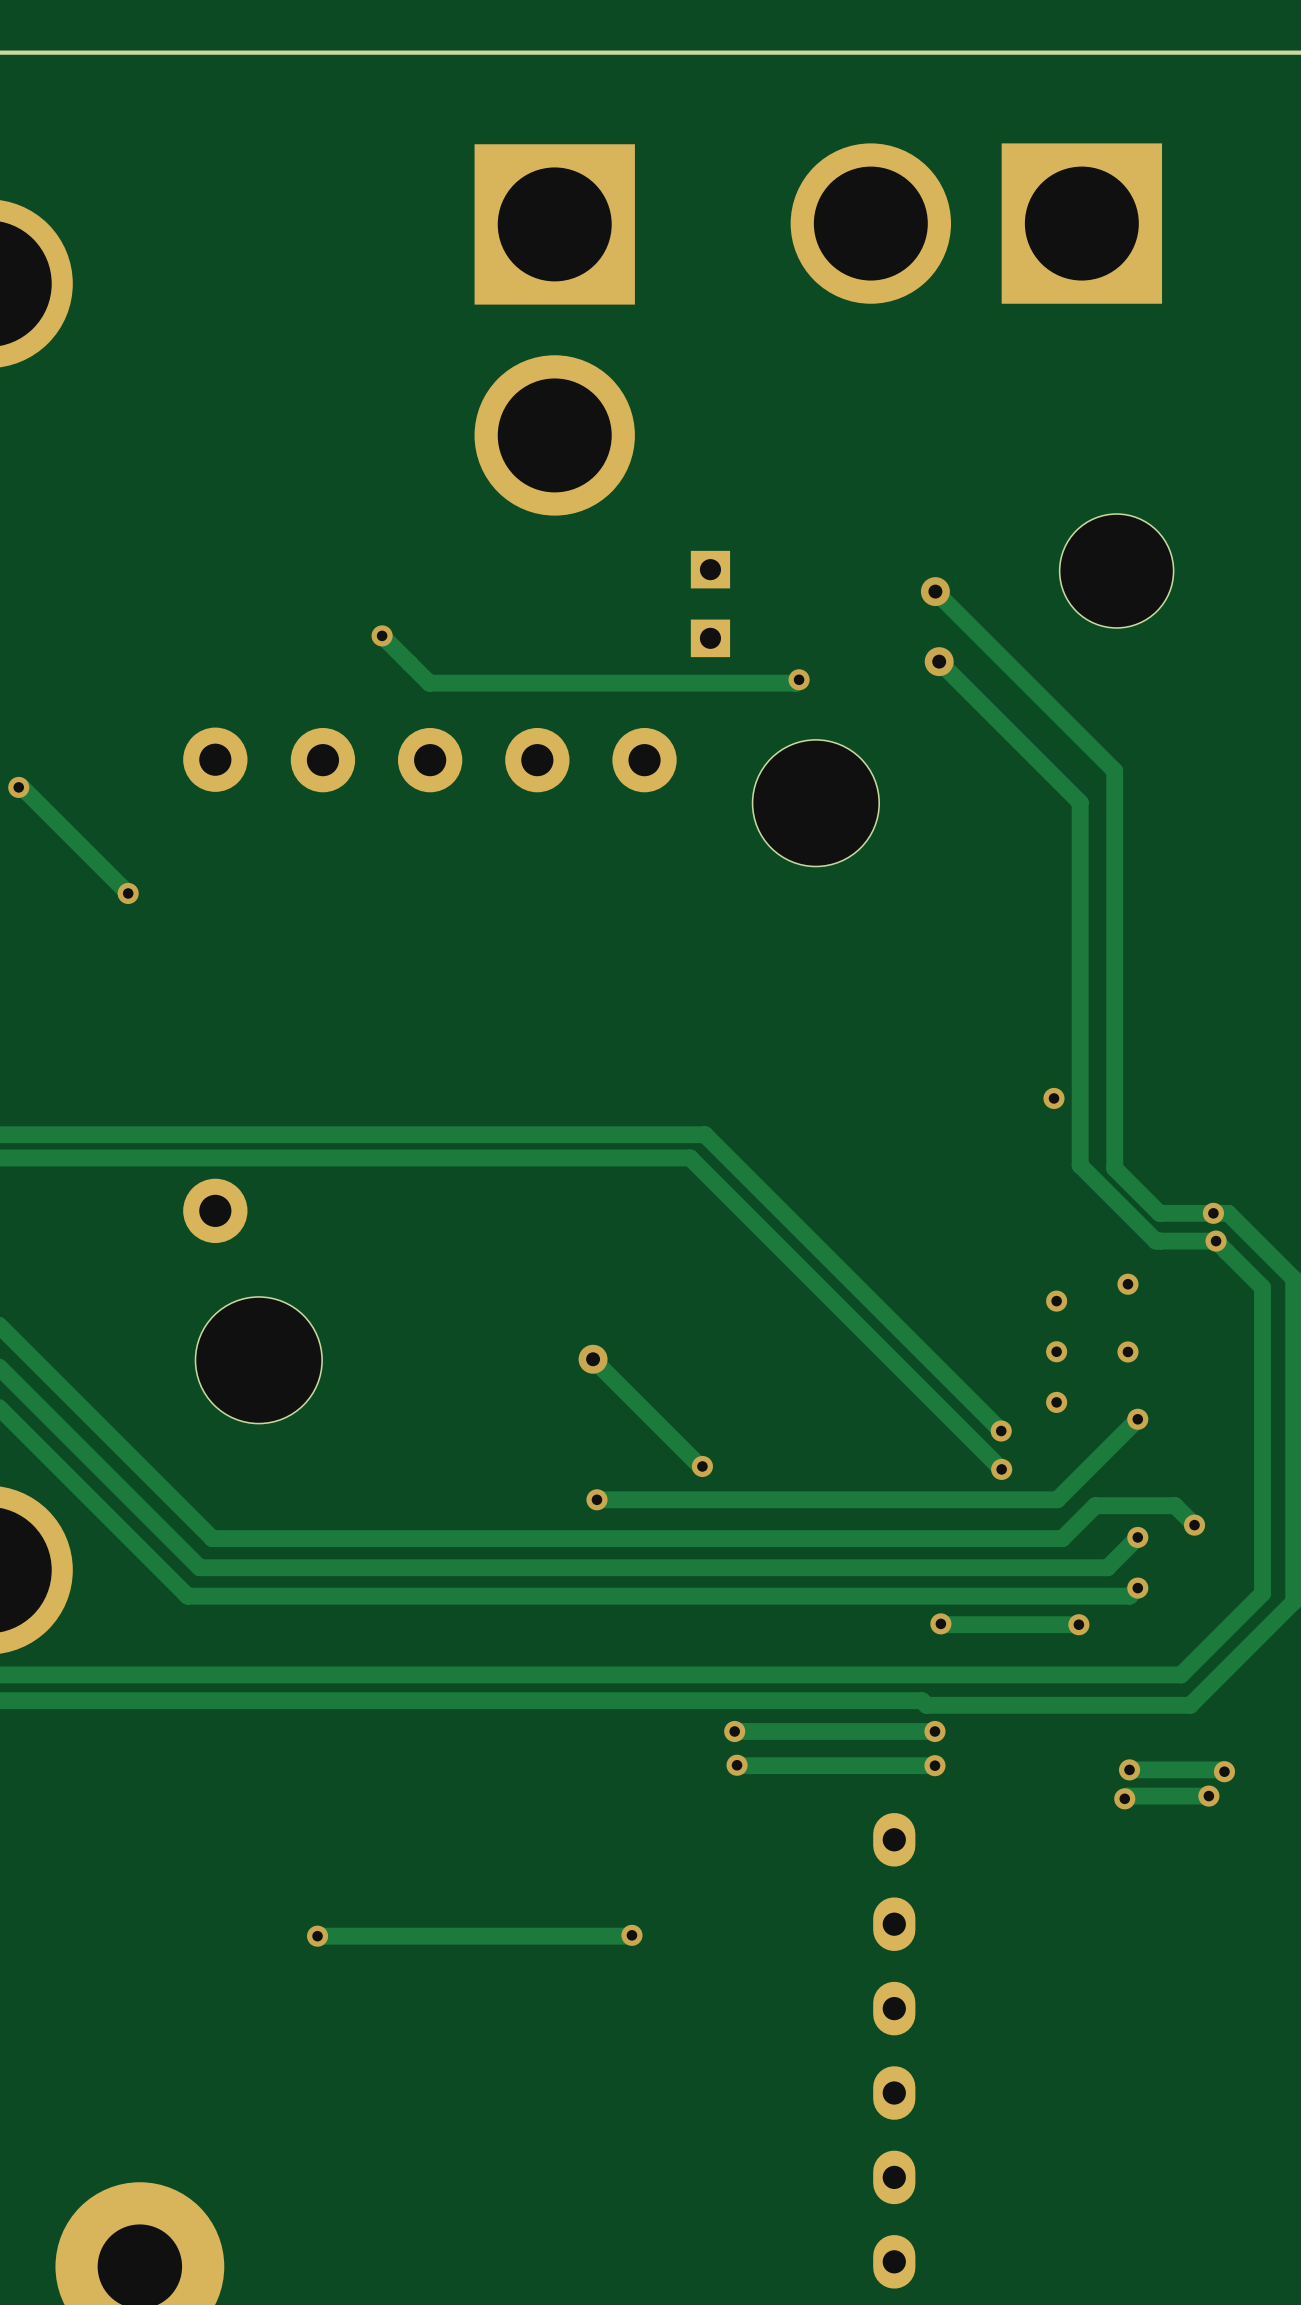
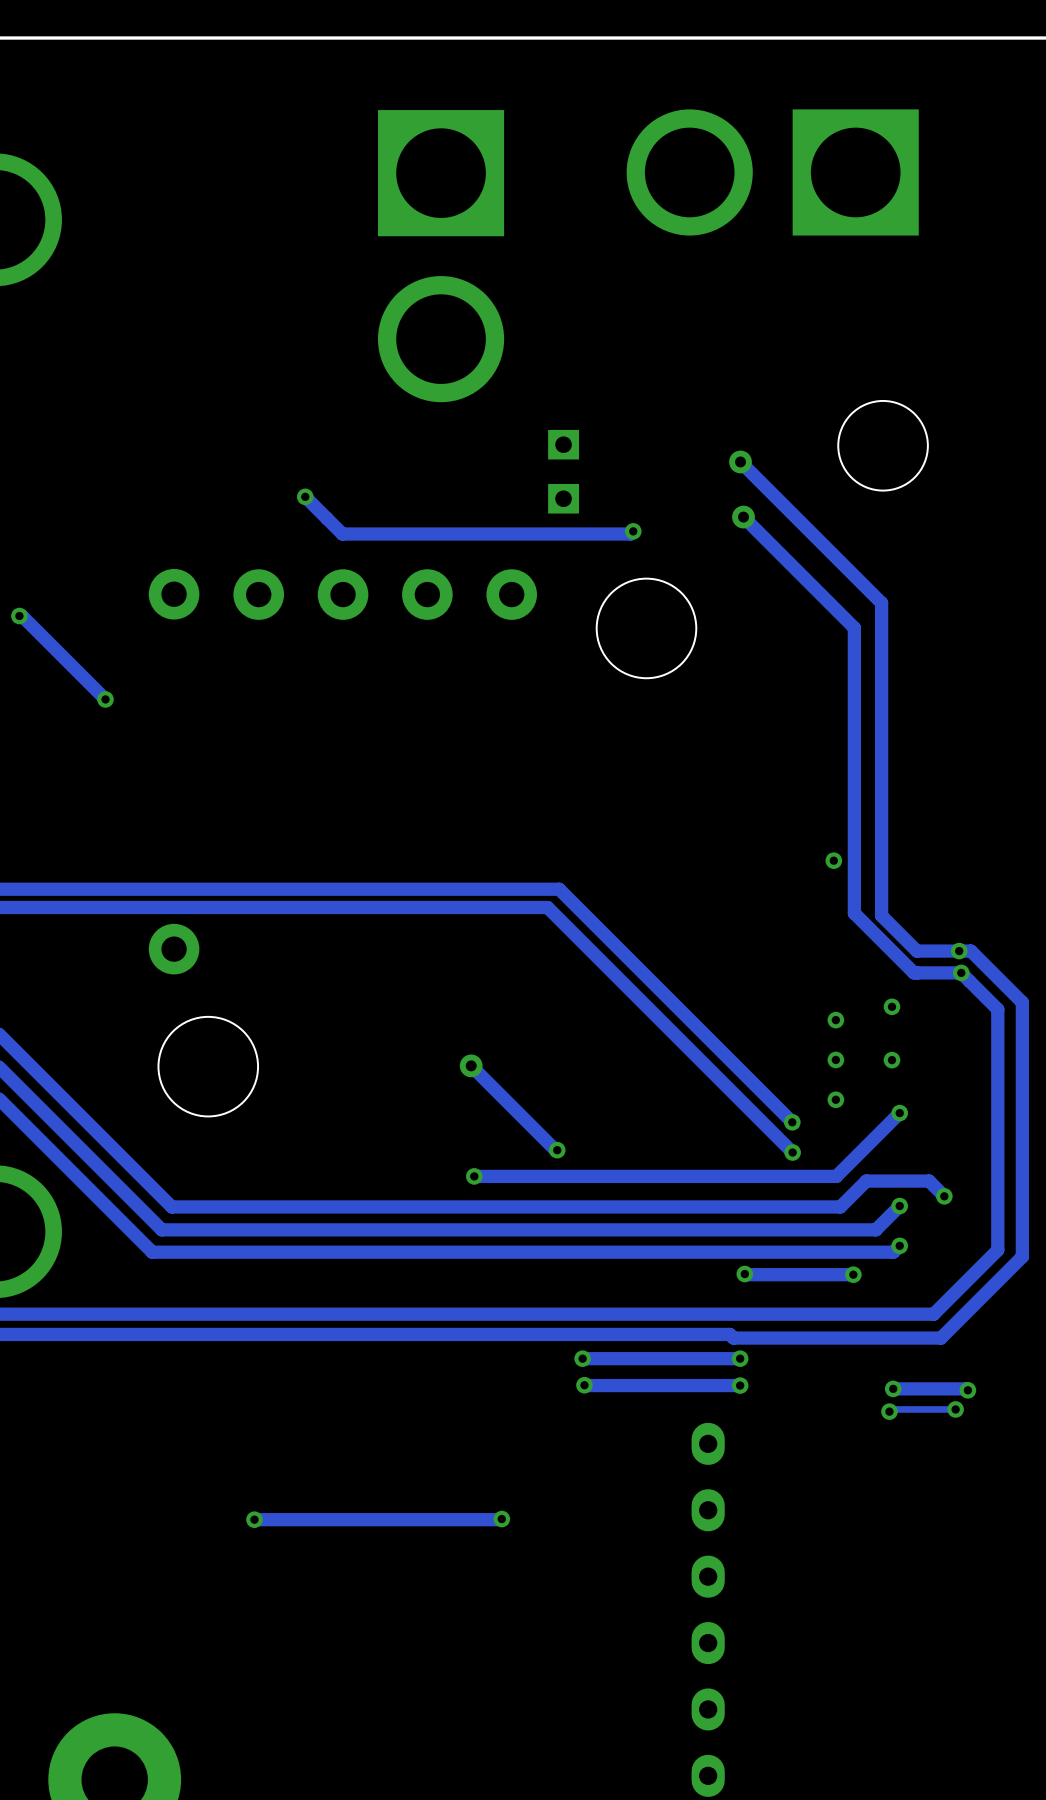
track width: thick (1208, 1796) (1127, 1796) (1124, 1798) -> thin (955, 1409) (891, 1409) (889, 1411)

